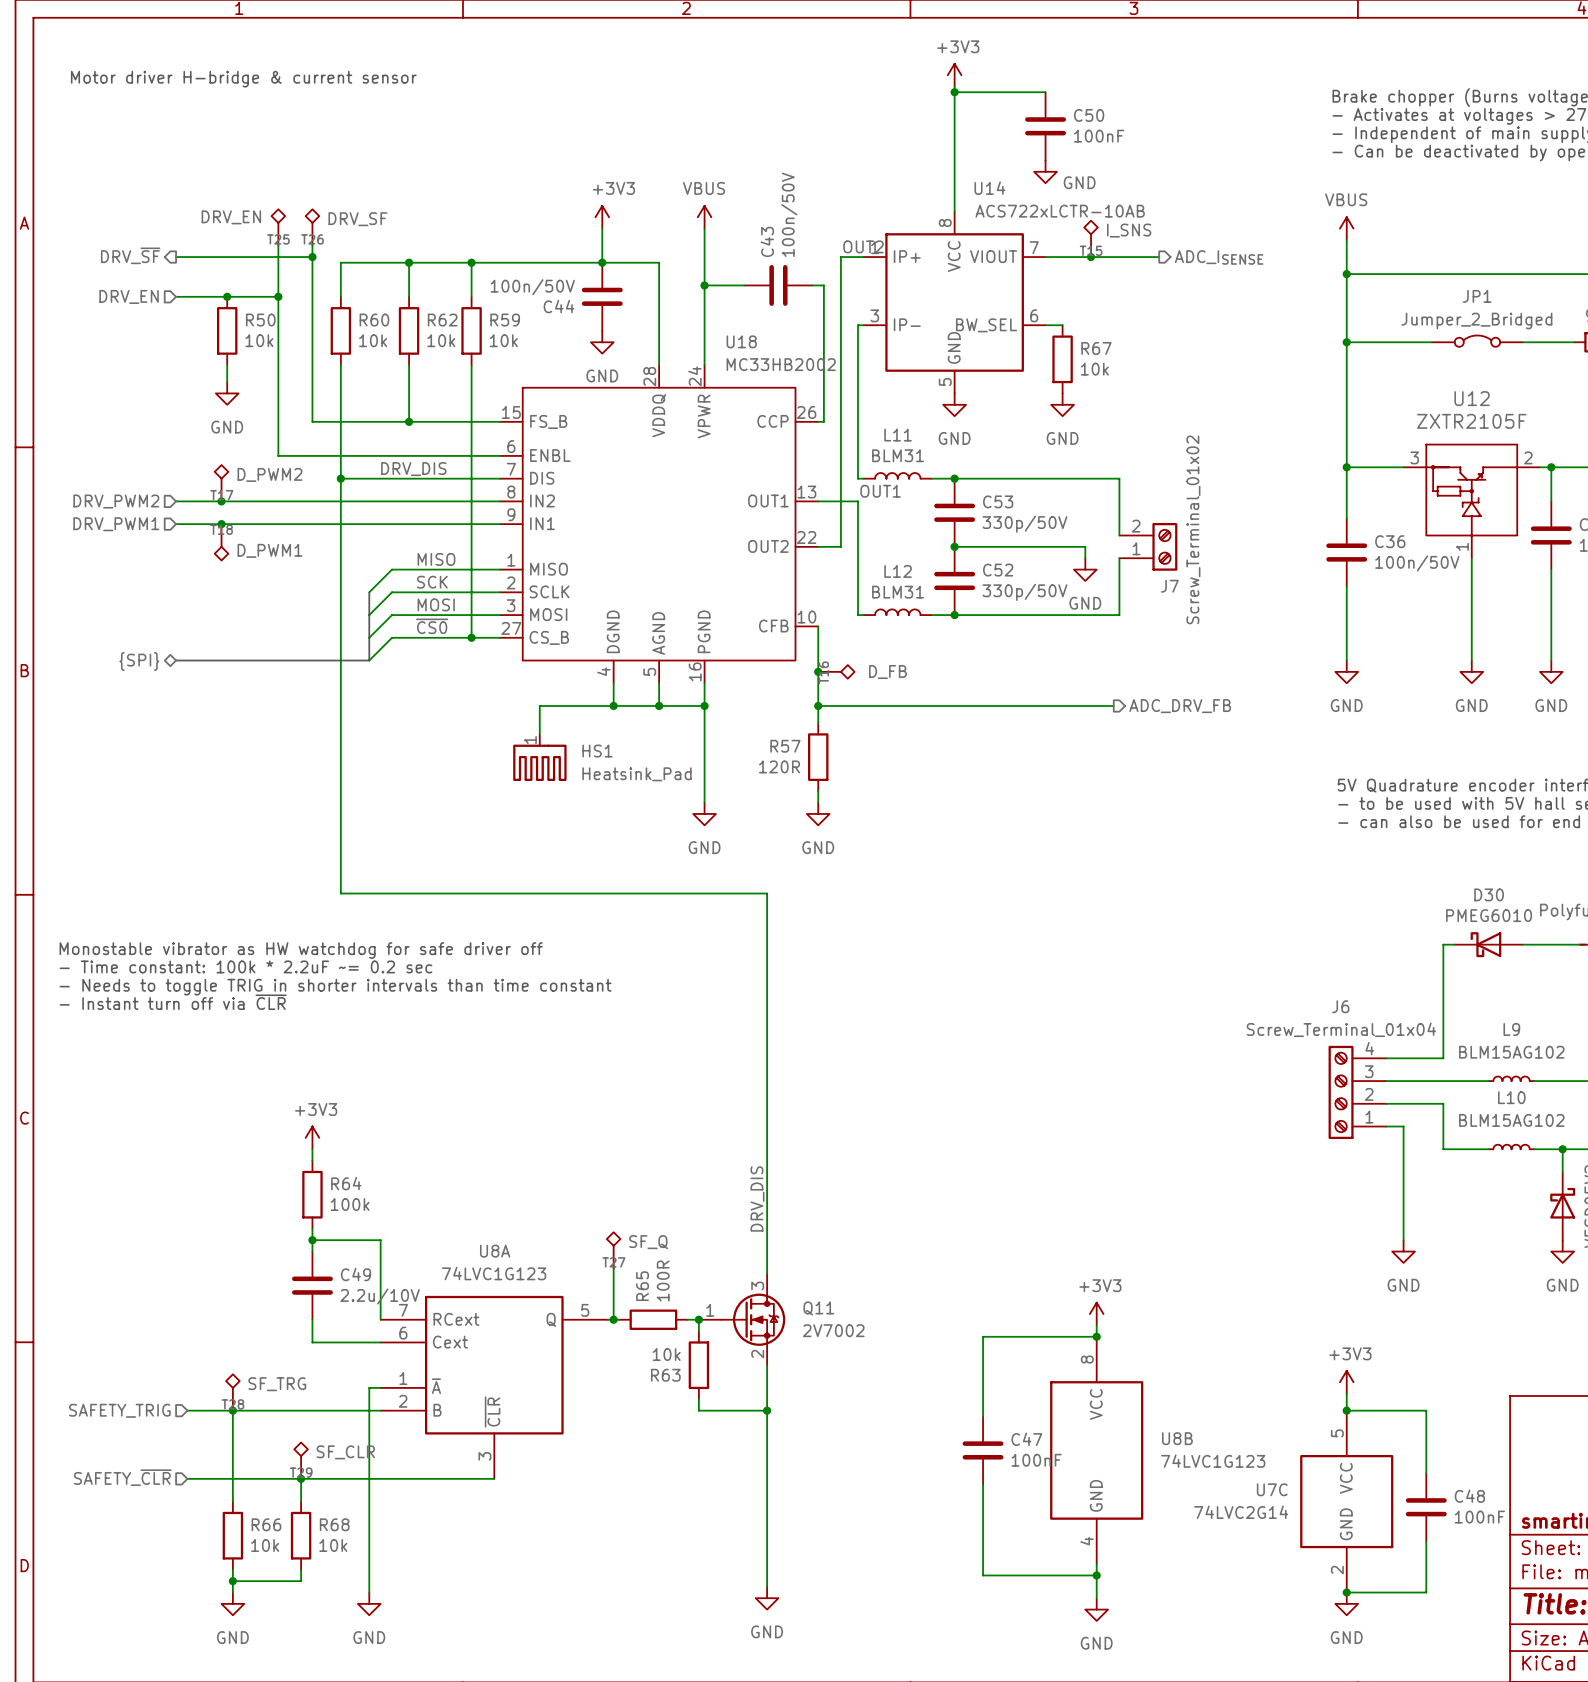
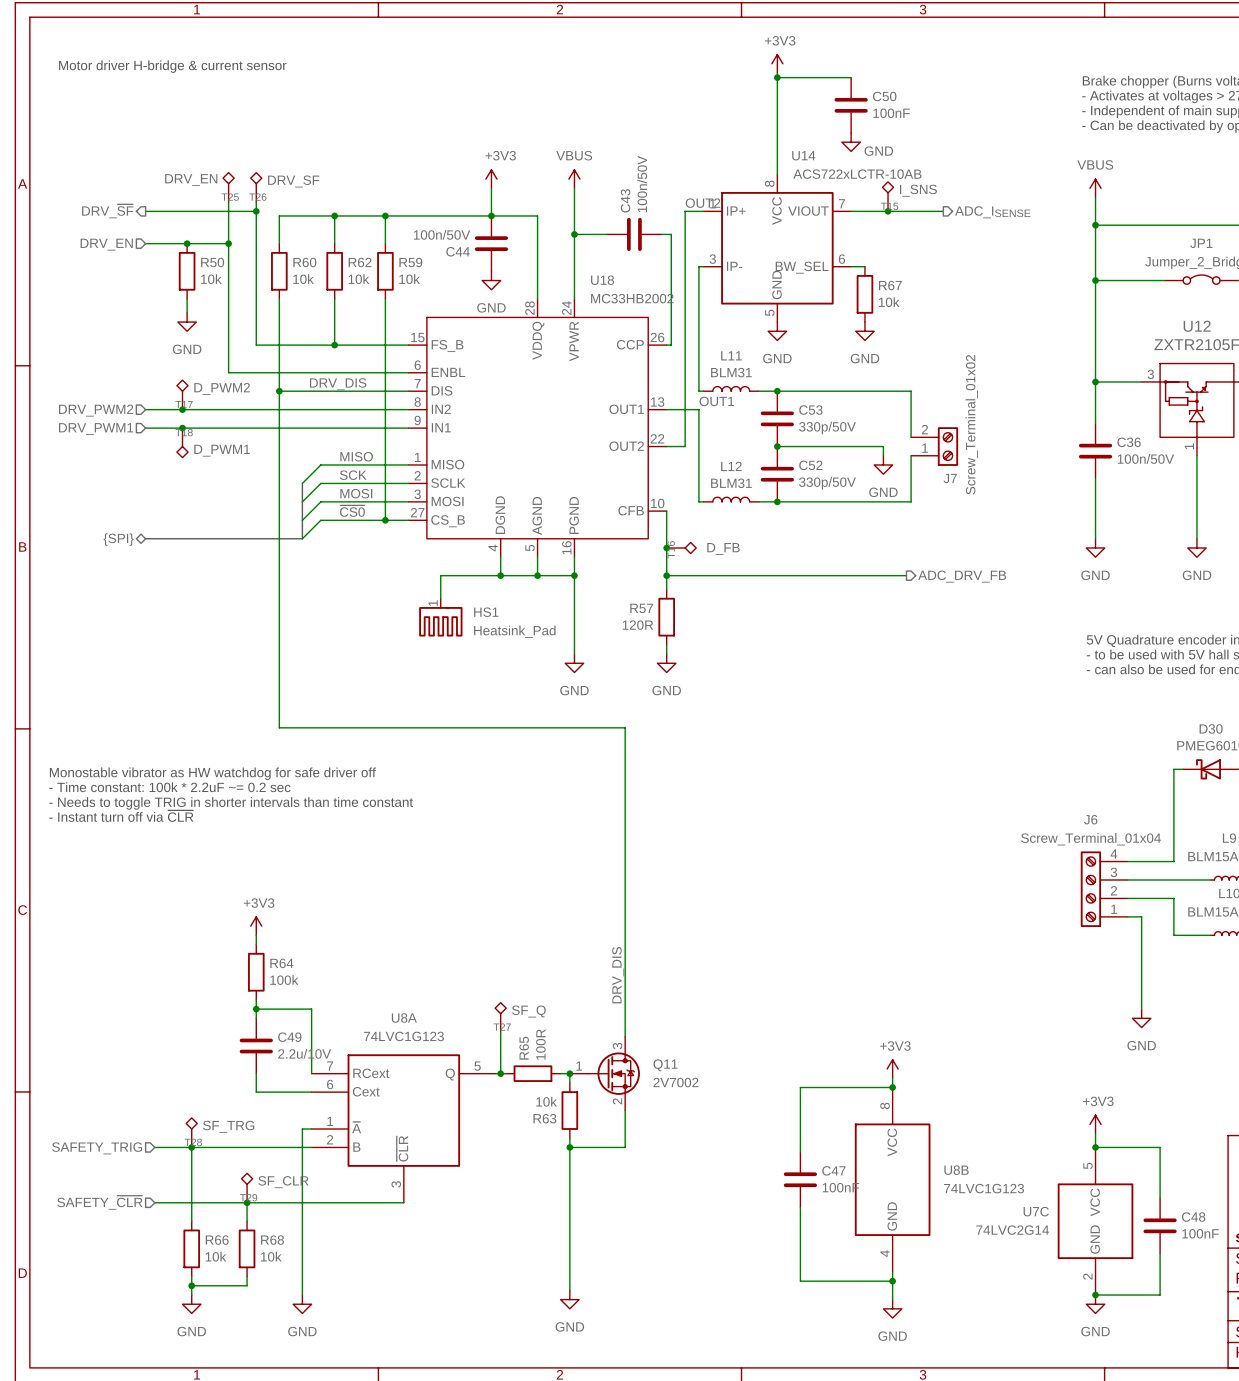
junction: none -> (569, 1147)
wire: (767, 1410) (767, 1586) -> (569, 1147) (569, 1290)
junction: (767, 1410) -> none
power symbol position: GND (767, 1598) -> GND (569, 1299)

